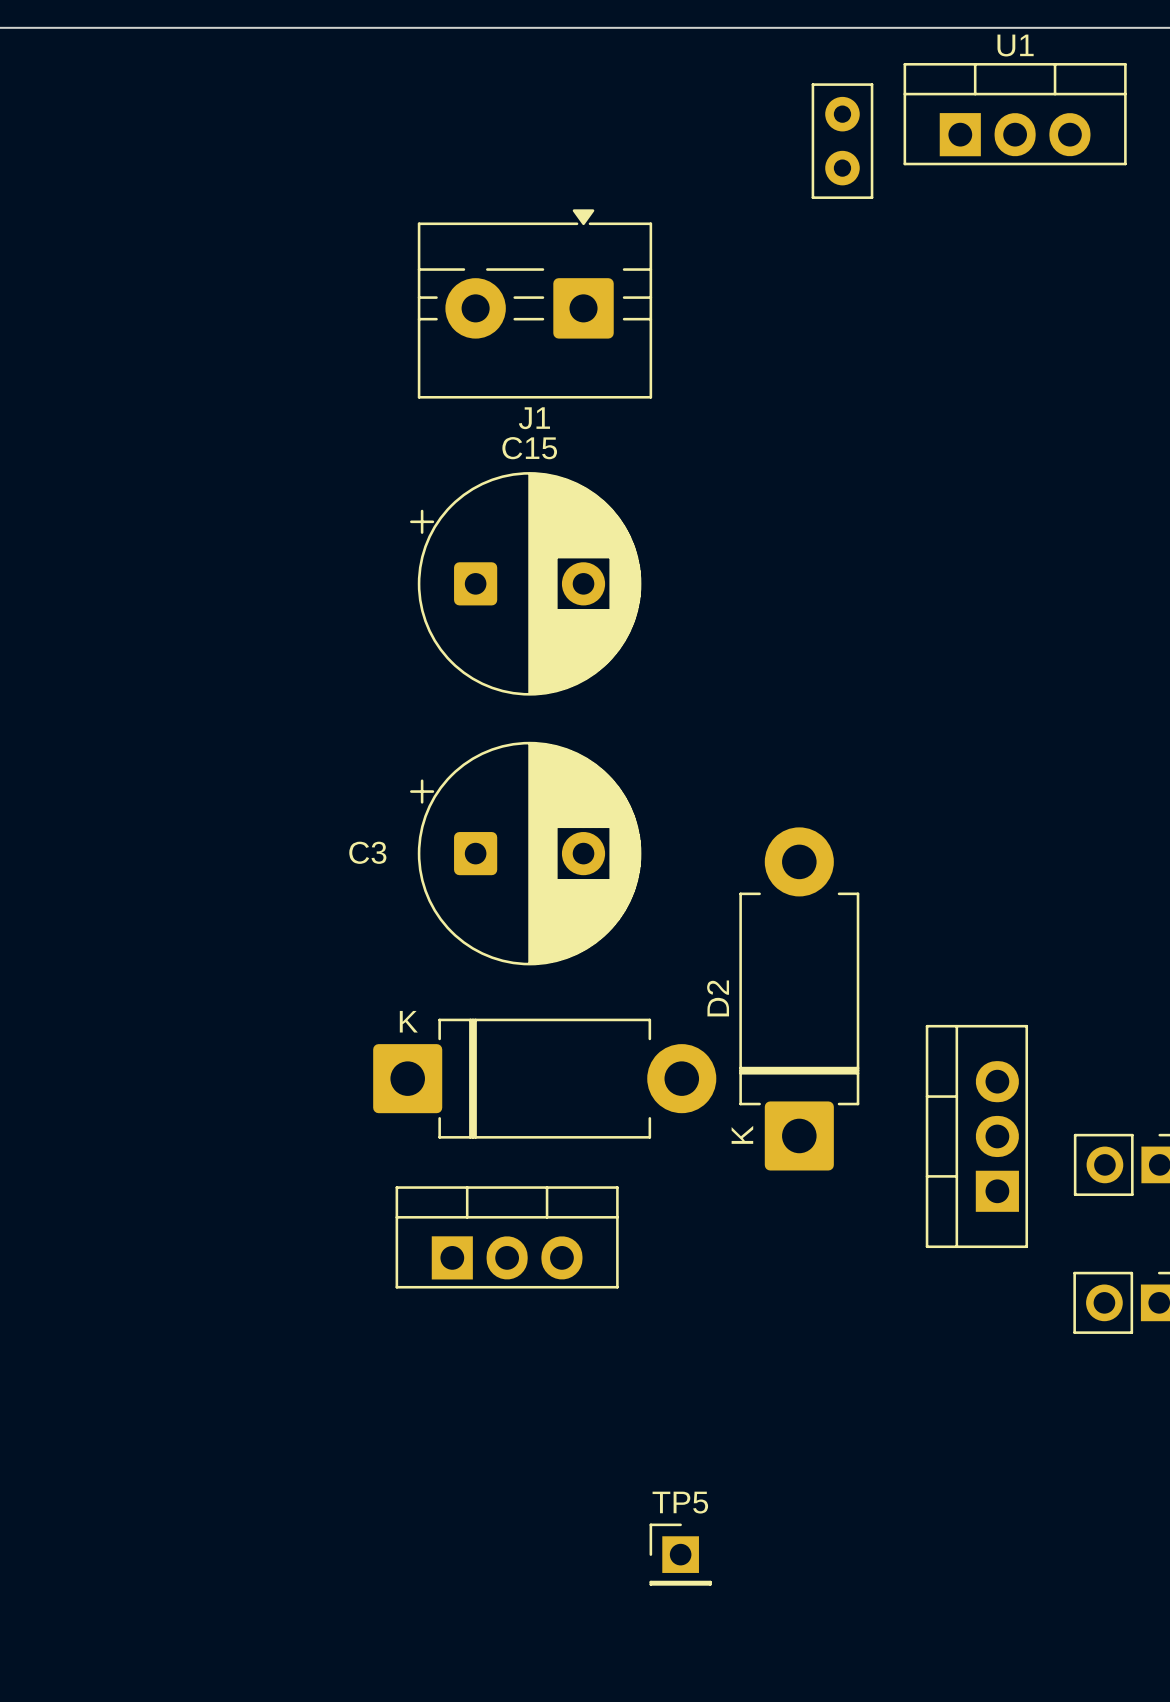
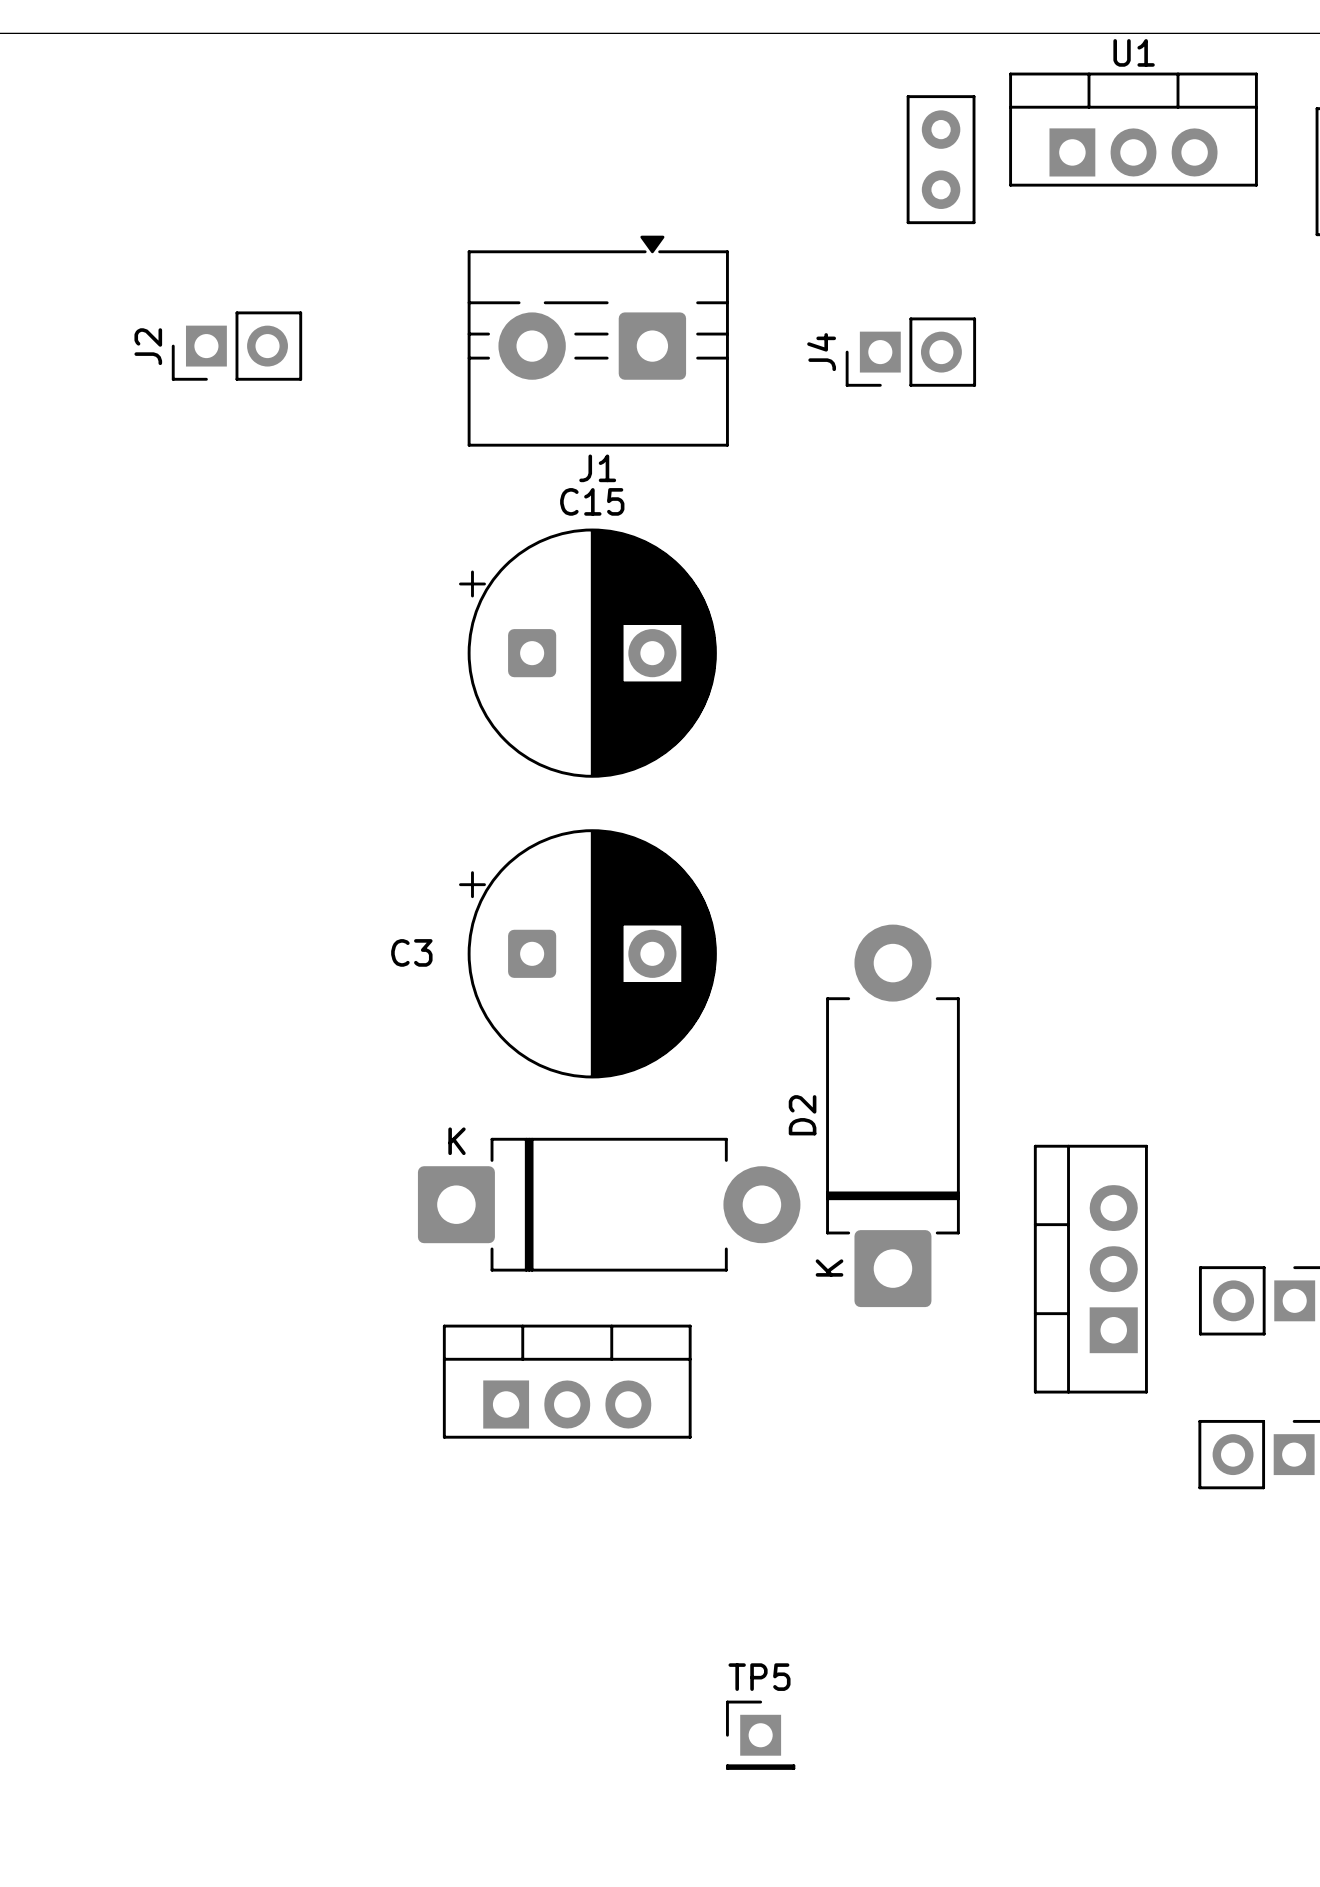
J2: none -> (236, 346)
J4: none -> (910, 352)

